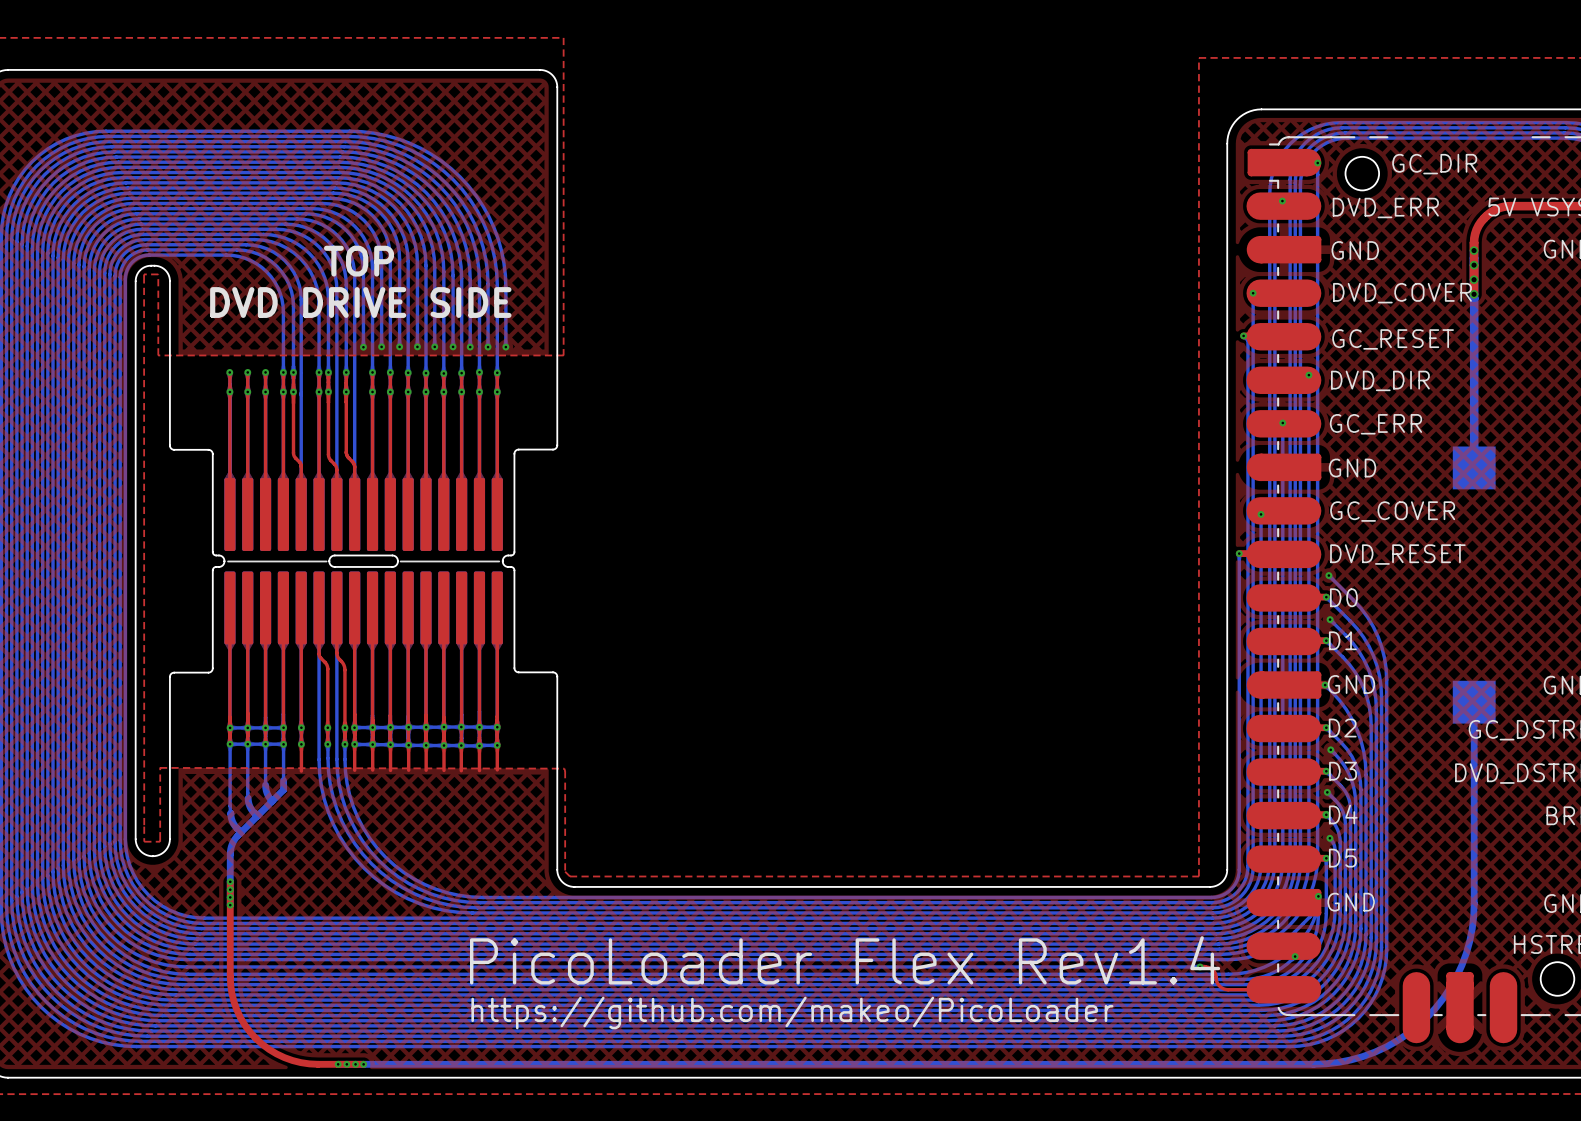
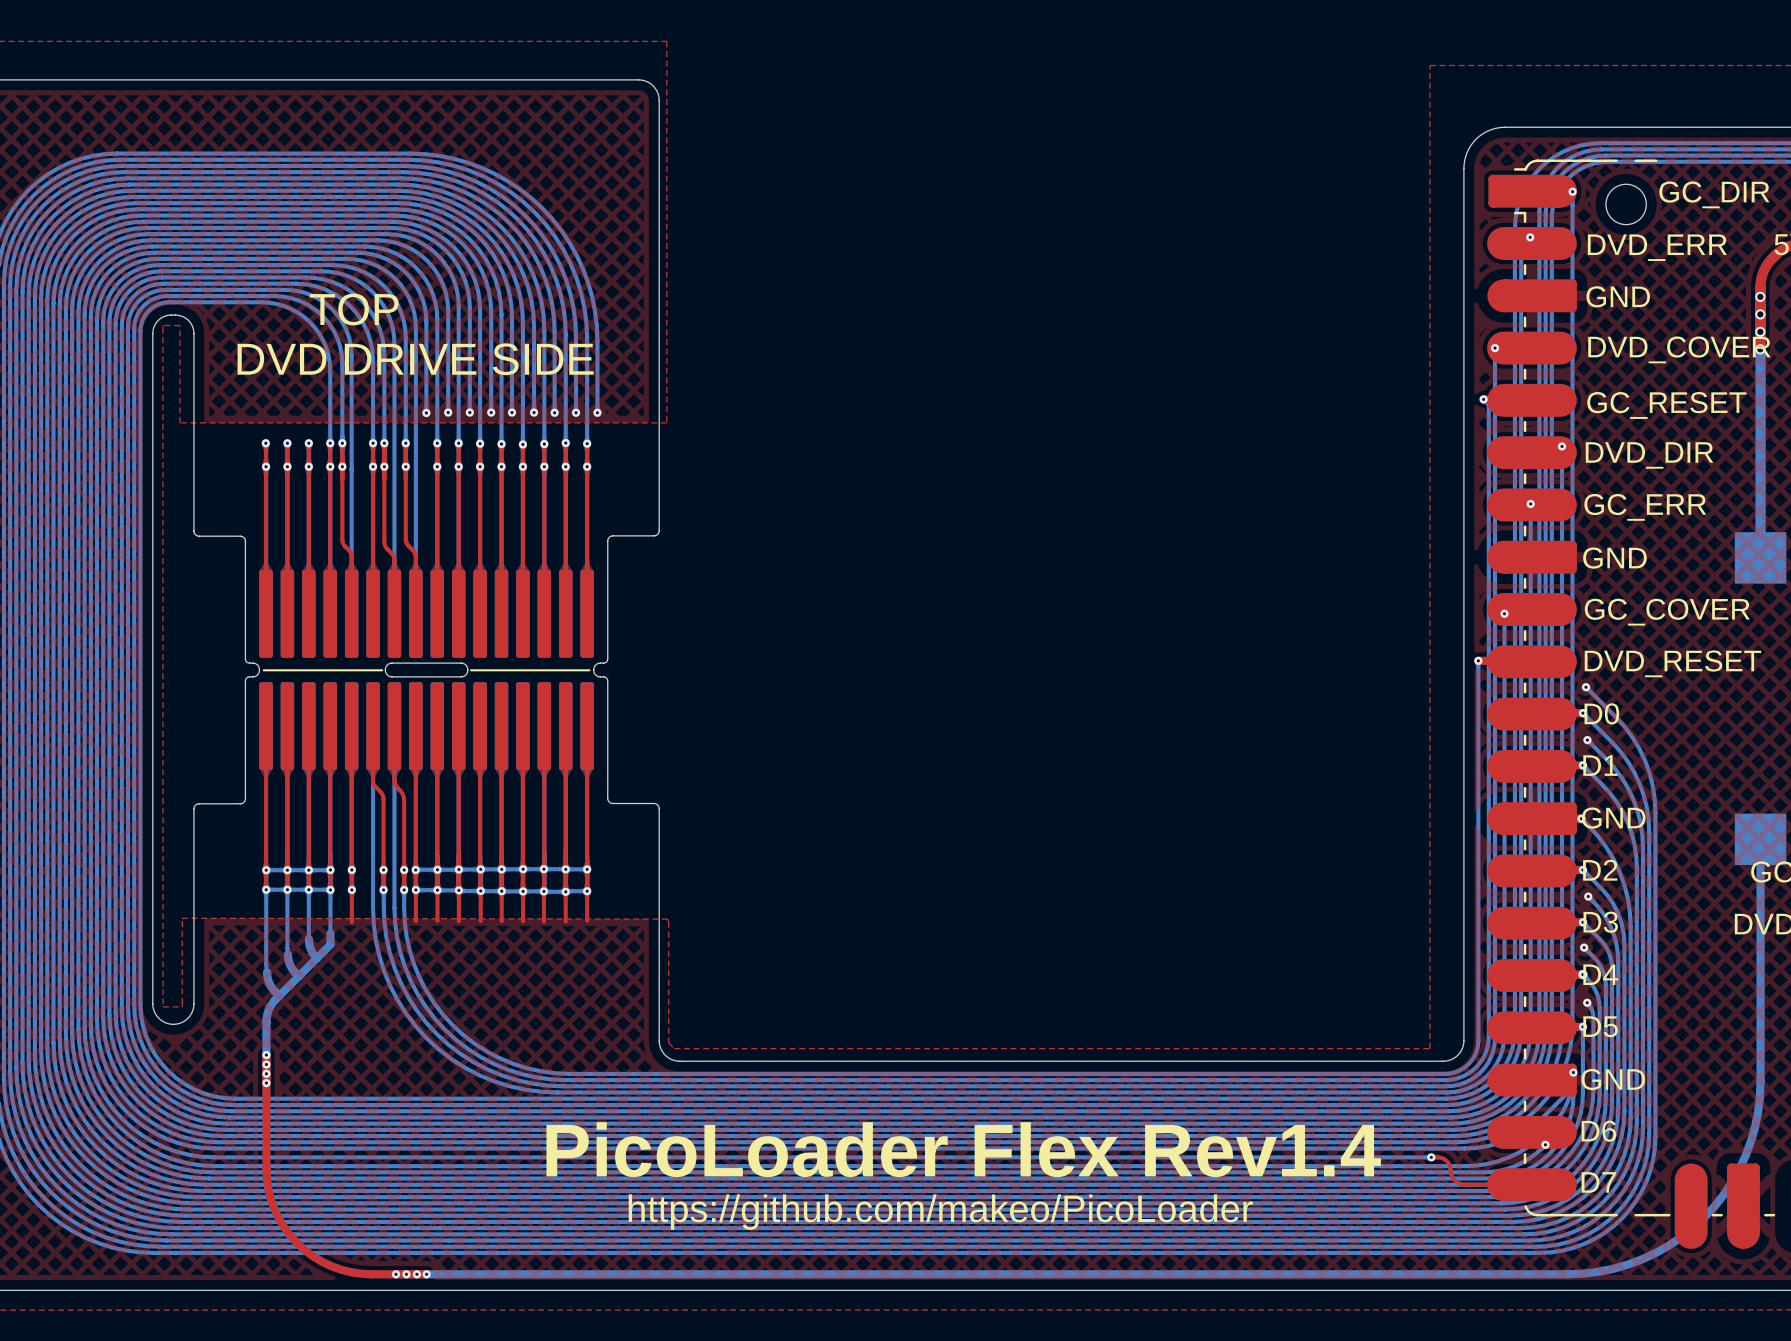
text: none -> D6 (1598, 1131)
text: none -> D7 (1598, 1182)

